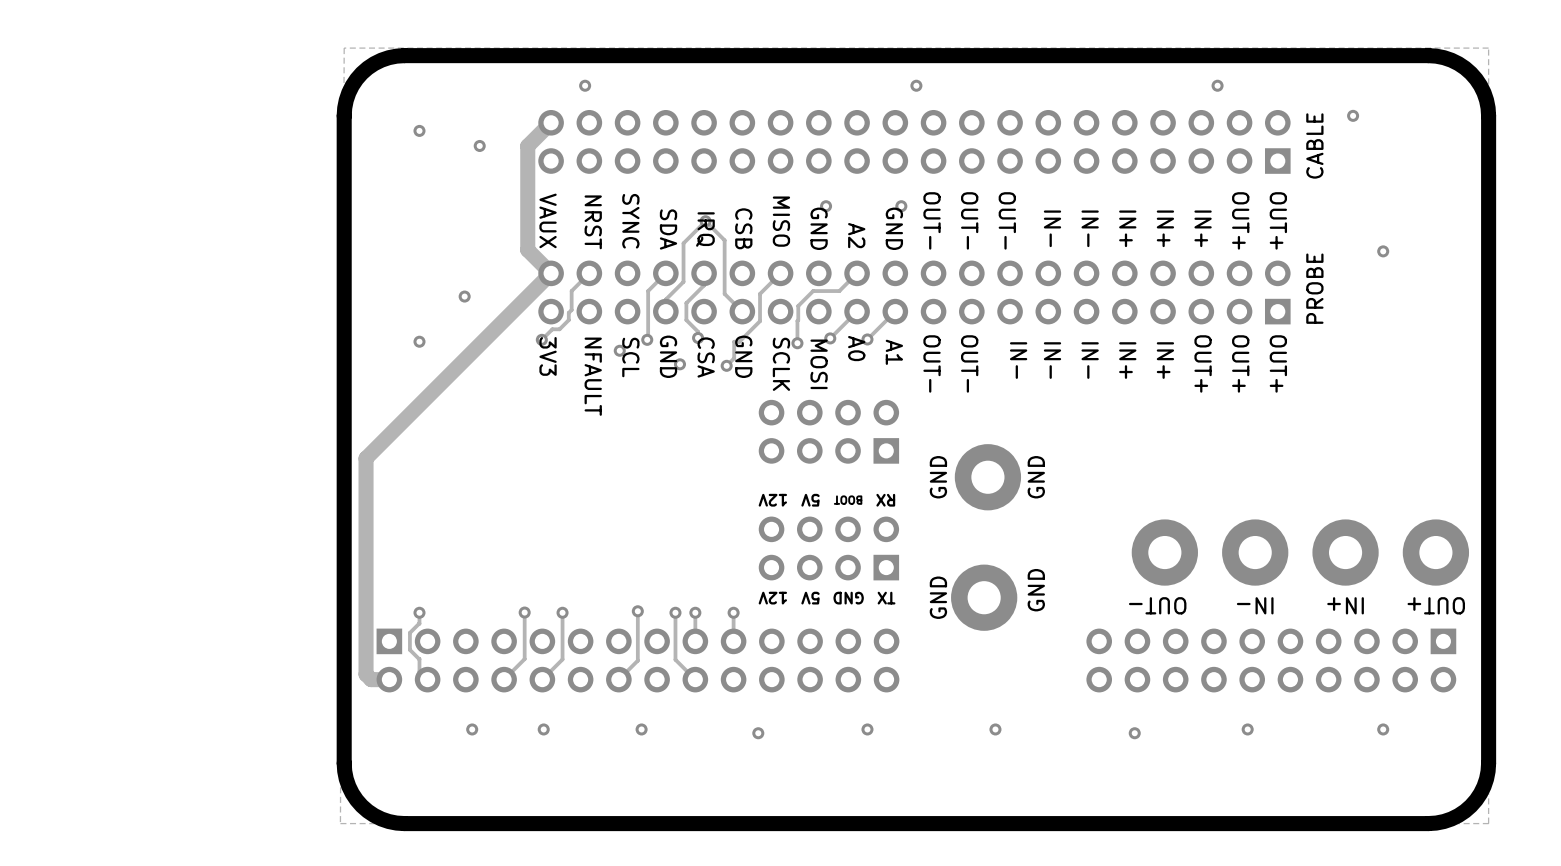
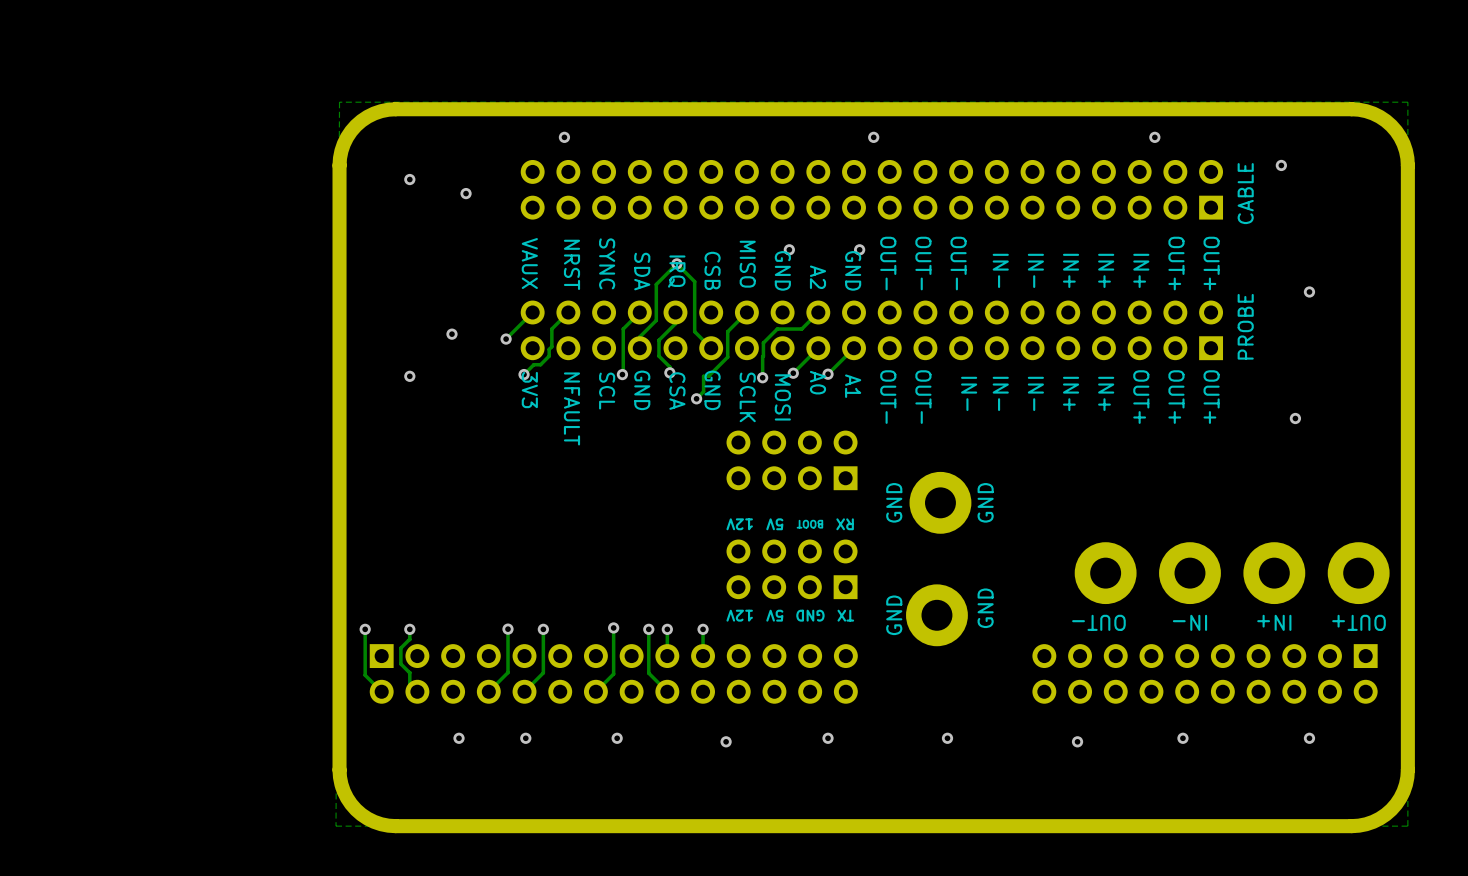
track: (551, 122) (527, 146) (527, 250) (551, 273) -> none
track width: thick (551, 273) (522, 301) -> thin (532, 312) (506, 339)
track: (522, 301) (366, 458) (366, 674) (371, 679) (389, 679) -> (365, 629) (365, 675) (381, 691)
via: none -> (506, 339)
via: (619, 350) -> none
via: (679, 364) -> none
via: none -> (1295, 418)
via: none -> (365, 629)

